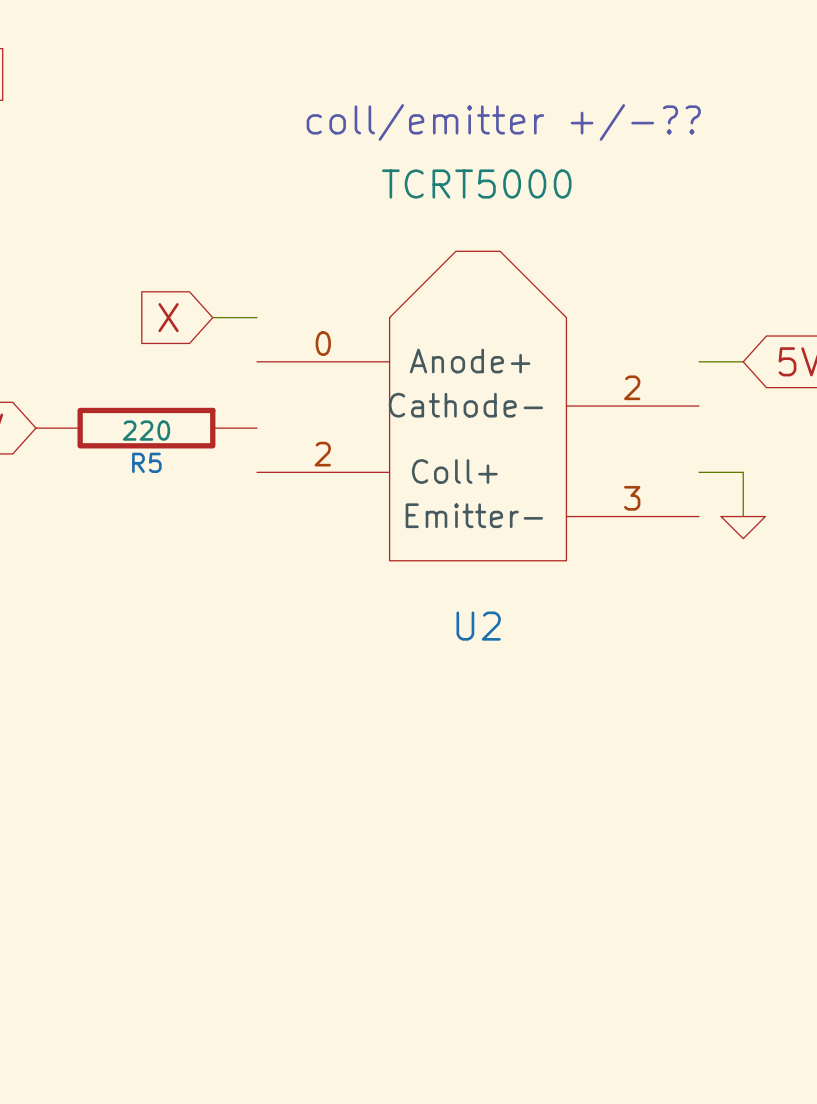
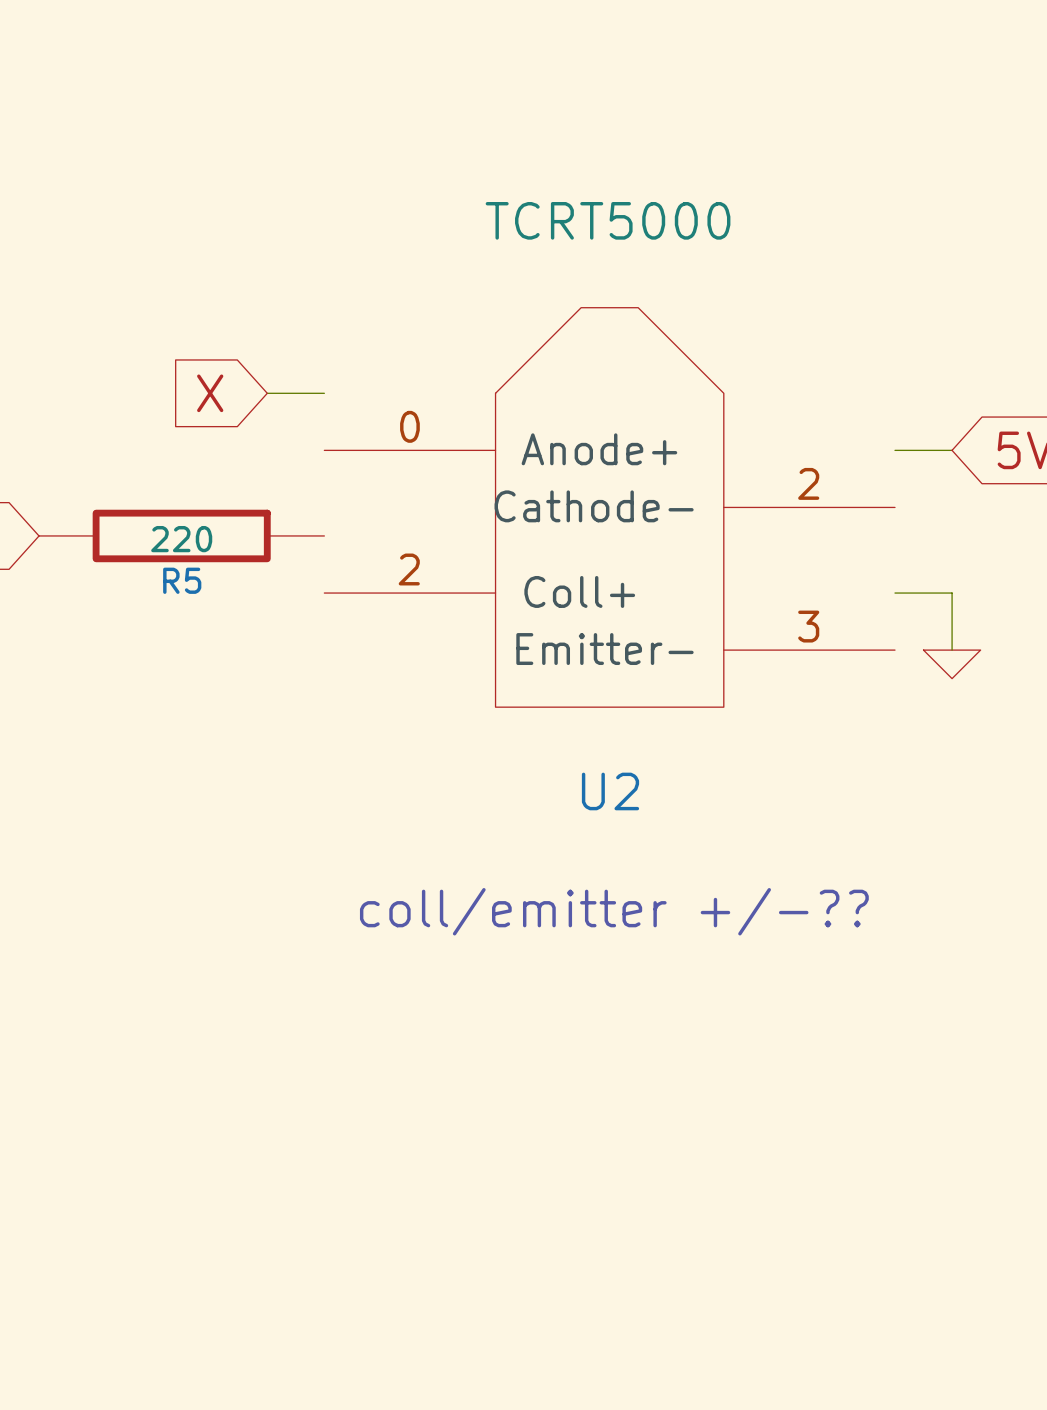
text: coll/emitter +/-?? (503, 122) -> none
text: none -> coll/emitter +/-?? (614, 911)

